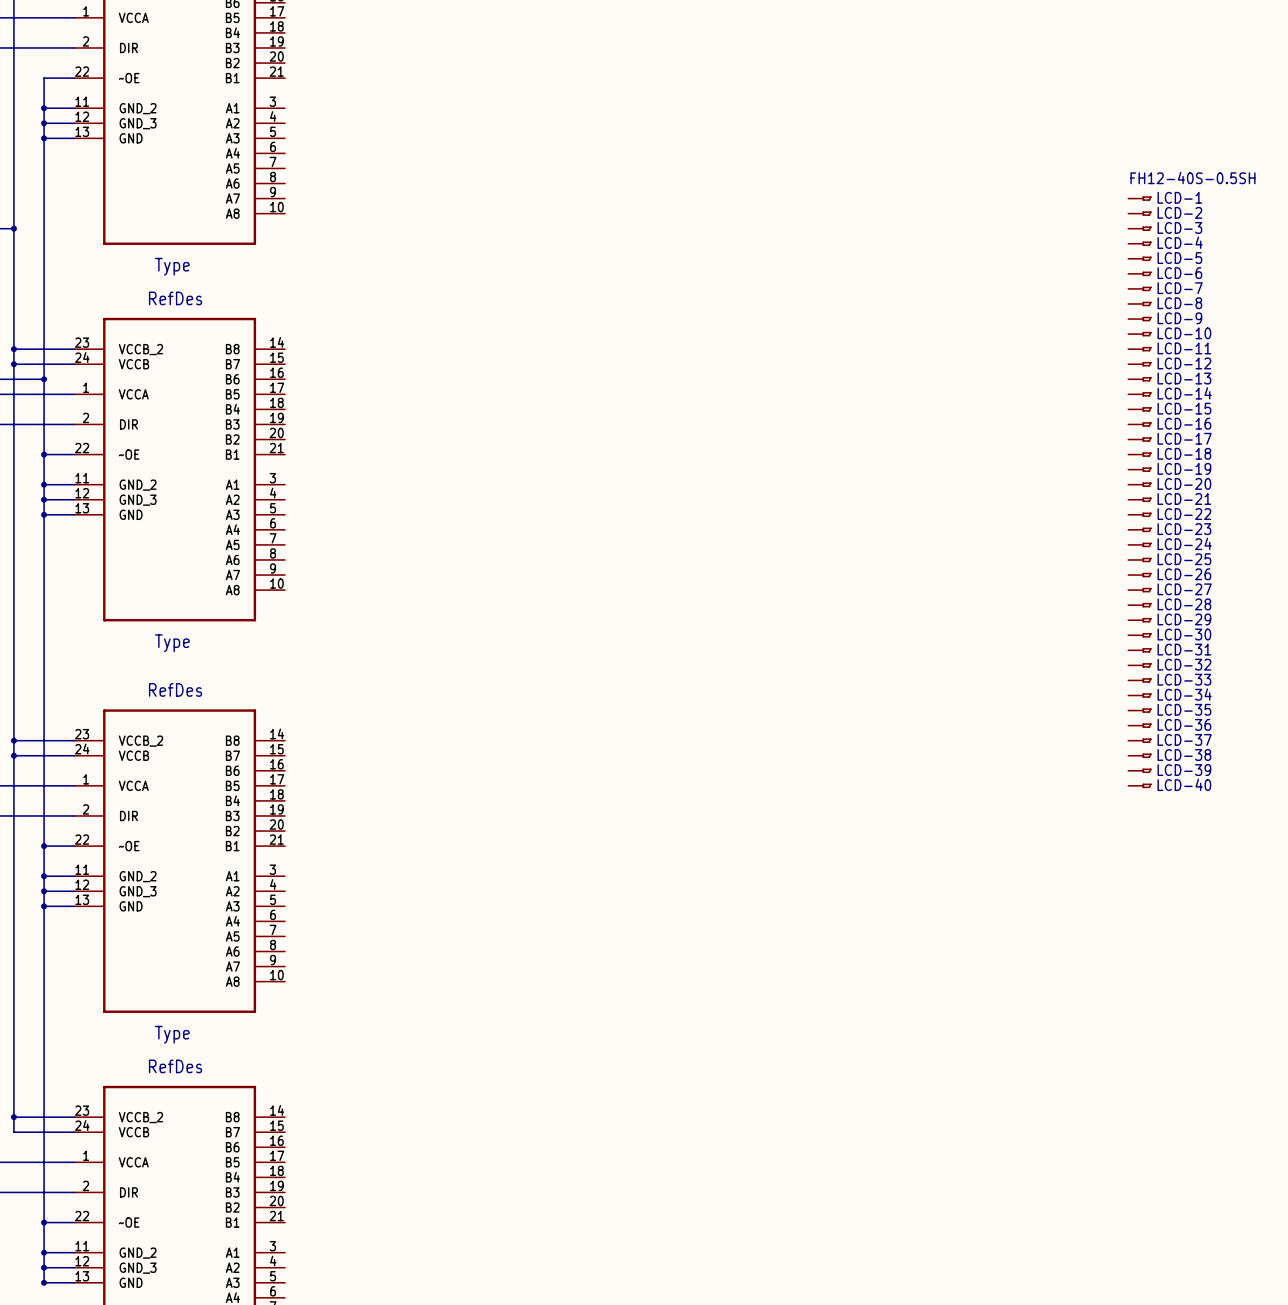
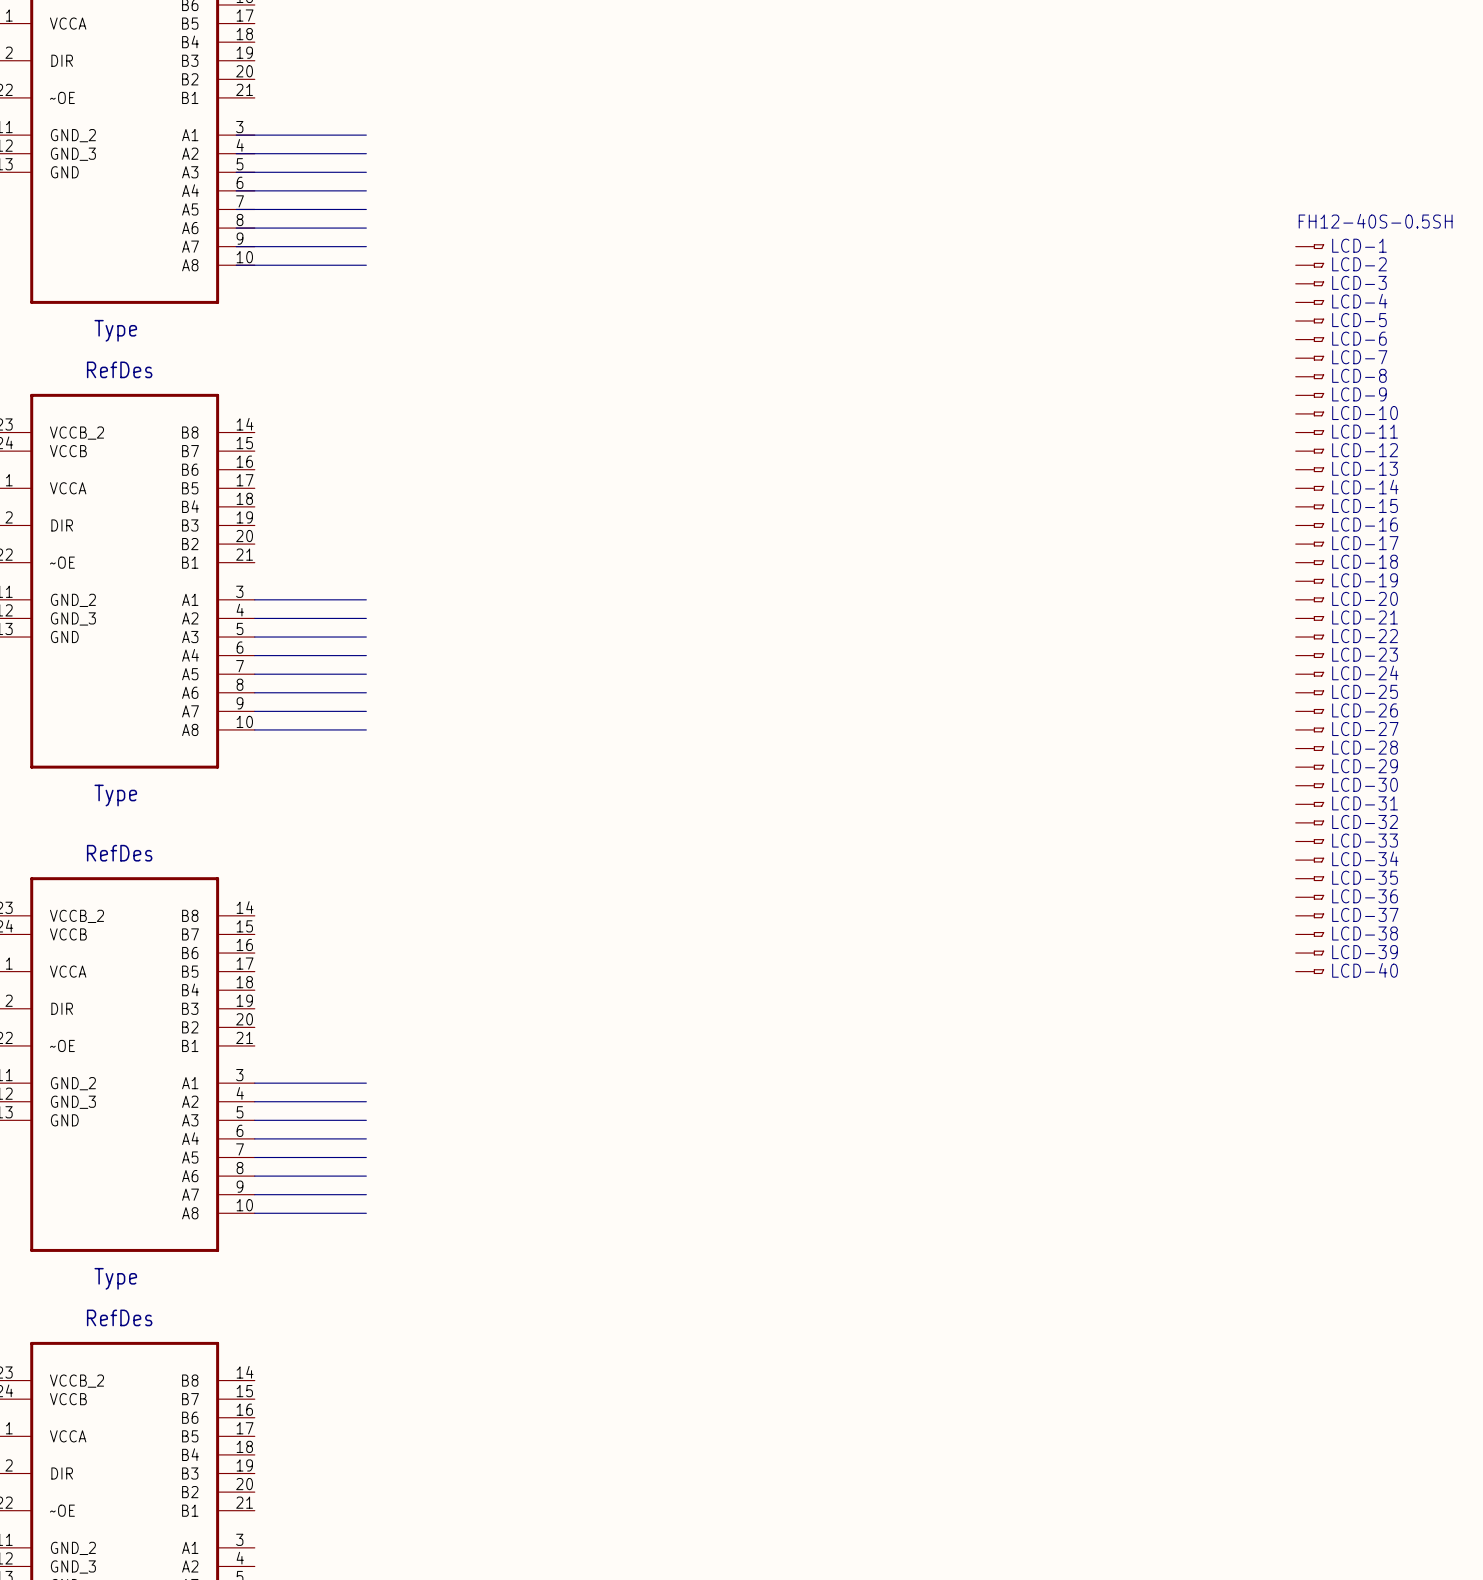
wire: none -> (236, 135) (366, 135)
wire: none -> (236, 153) (366, 153)
wire: none -> (236, 172) (366, 172)
wire: none -> (236, 190) (366, 190)
wire: none -> (236, 209) (366, 209)
wire: none -> (236, 228) (366, 228)
wire: none -> (236, 246) (366, 246)
wire: none -> (236, 265) (366, 265)
wire: none -> (254, 599) (366, 599)
wire: none -> (254, 618) (366, 618)
wire: none -> (254, 637) (366, 637)
wire: none -> (254, 655) (366, 655)
wire: none -> (254, 674) (366, 674)
wire: none -> (254, 692) (366, 692)
wire: none -> (254, 711) (366, 711)
wire: none -> (254, 729) (366, 729)
wire: none -> (254, 1083) (366, 1083)
wire: none -> (254, 1101) (366, 1101)
wire: none -> (254, 1120) (366, 1120)
wire: none -> (254, 1138) (366, 1138)
wire: none -> (254, 1157) (366, 1157)
wire: none -> (254, 1176) (366, 1176)
wire: none -> (254, 1194) (366, 1194)
wire: none -> (254, 1213) (366, 1213)

